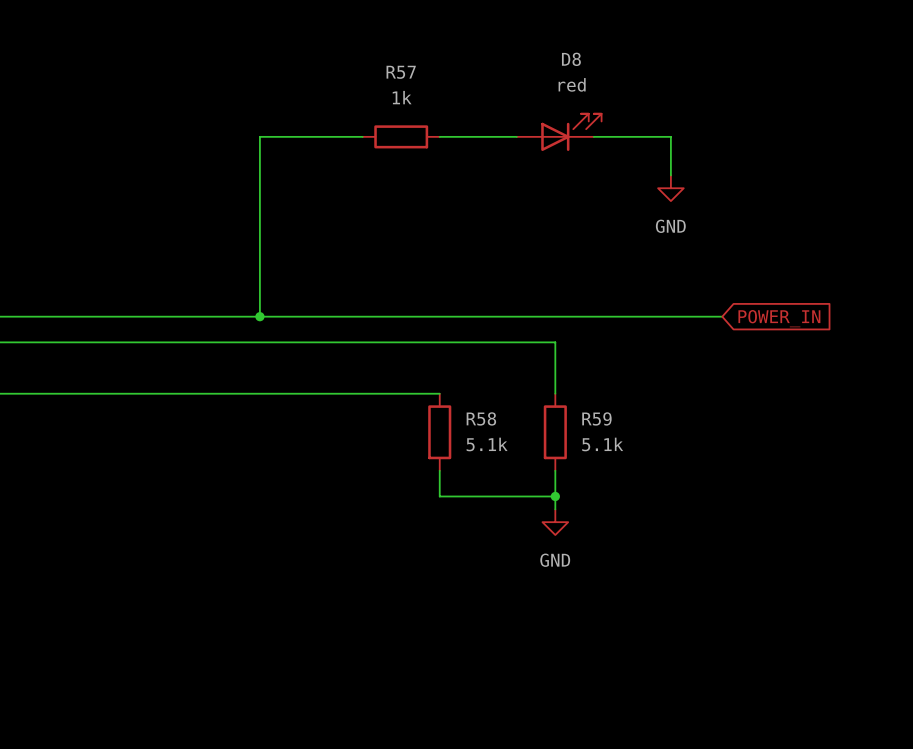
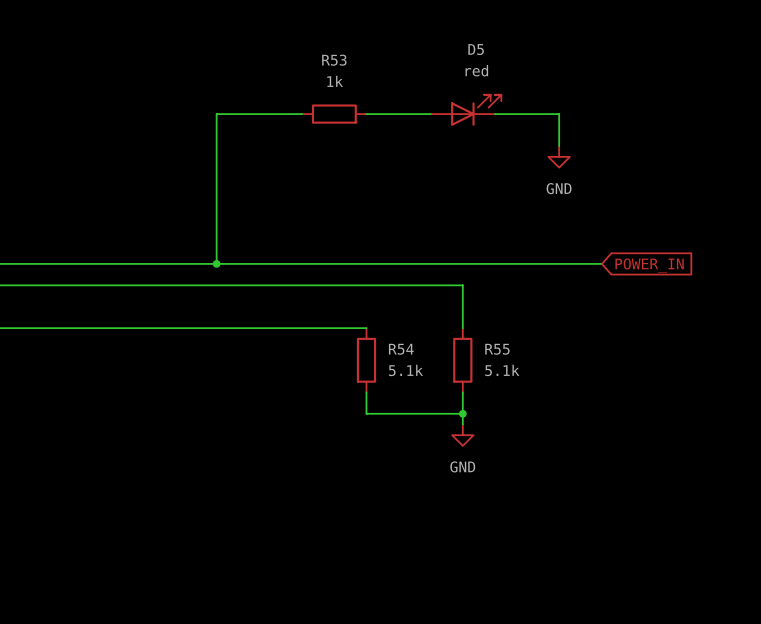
D8 name: D8 (571, 59) -> D5 (476, 49)
R57 name: R57 (401, 72) -> R53 (334, 60)
R58 name: R58 (481, 418) -> R54 (401, 349)
R59 name: R59 (596, 418) -> R55 (497, 349)

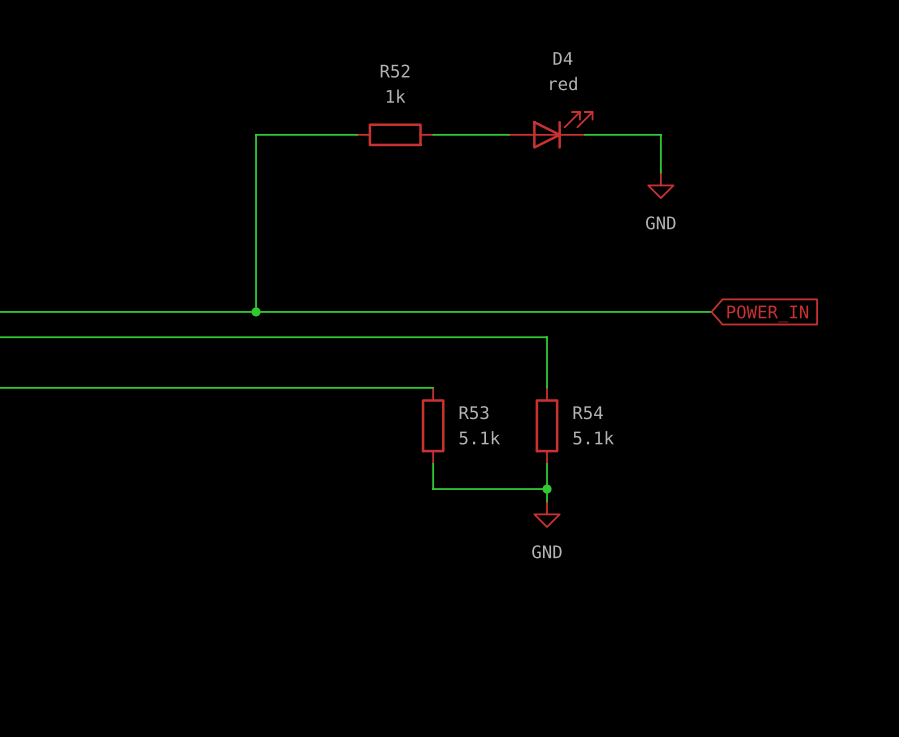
D5 name: D5 (476, 49) -> D4 (562, 58)
R53 name: R53 (334, 60) -> R52 (395, 71)
R54 name: R54 (401, 349) -> R53 (474, 412)
R55 name: R55 (497, 349) -> R54 (588, 412)

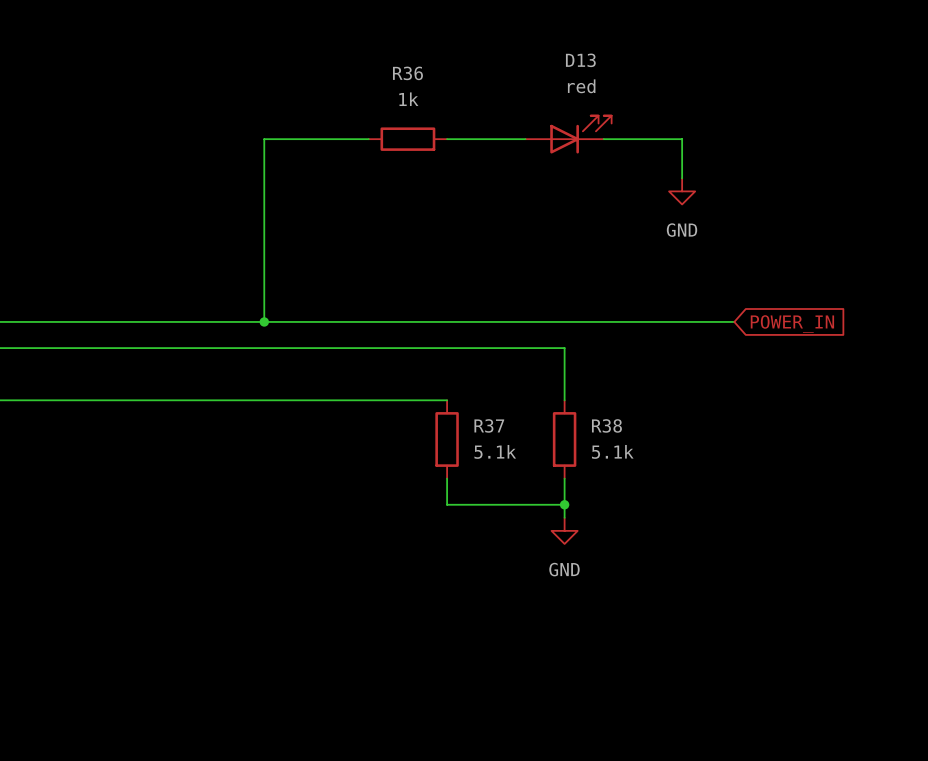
D4 name: D4 (562, 58) -> D13 (580, 60)
R52 name: R52 (395, 71) -> R36 (407, 73)
R53 name: R53 (474, 412) -> R37 (489, 425)
R54 name: R54 (588, 412) -> R38 (606, 425)

